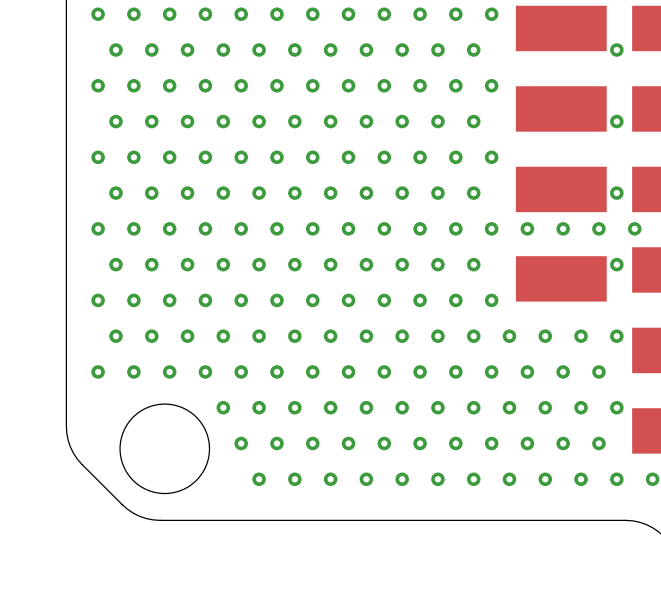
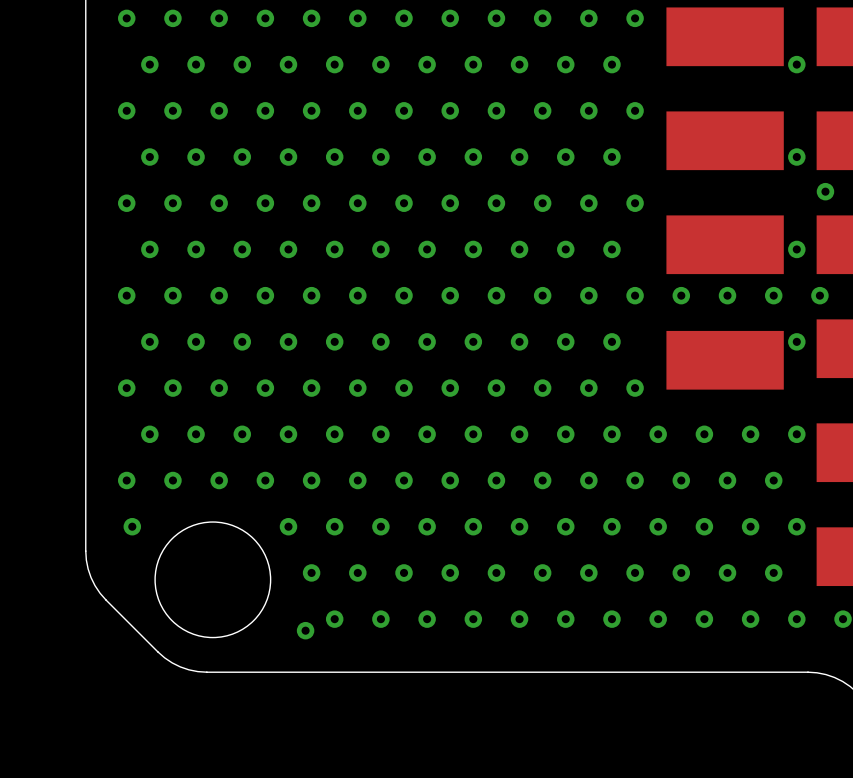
via: none -> (825, 191)
via: none -> (132, 526)
via: none -> (305, 630)

